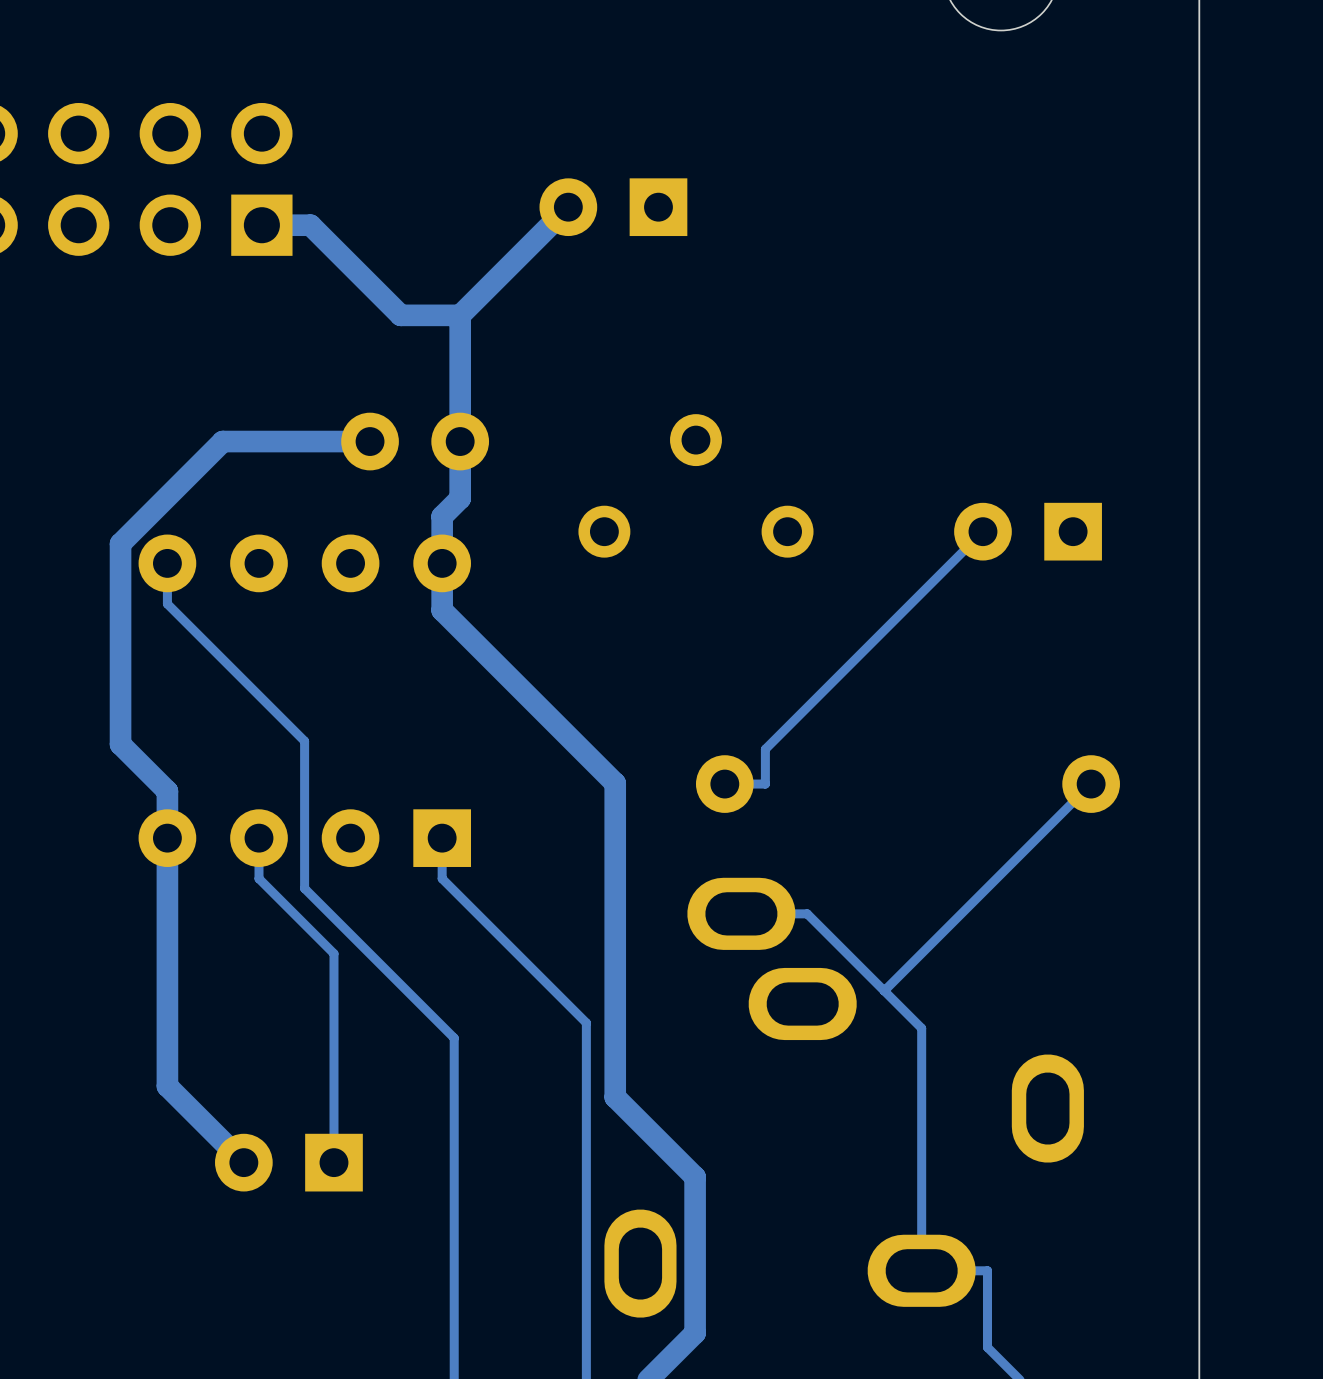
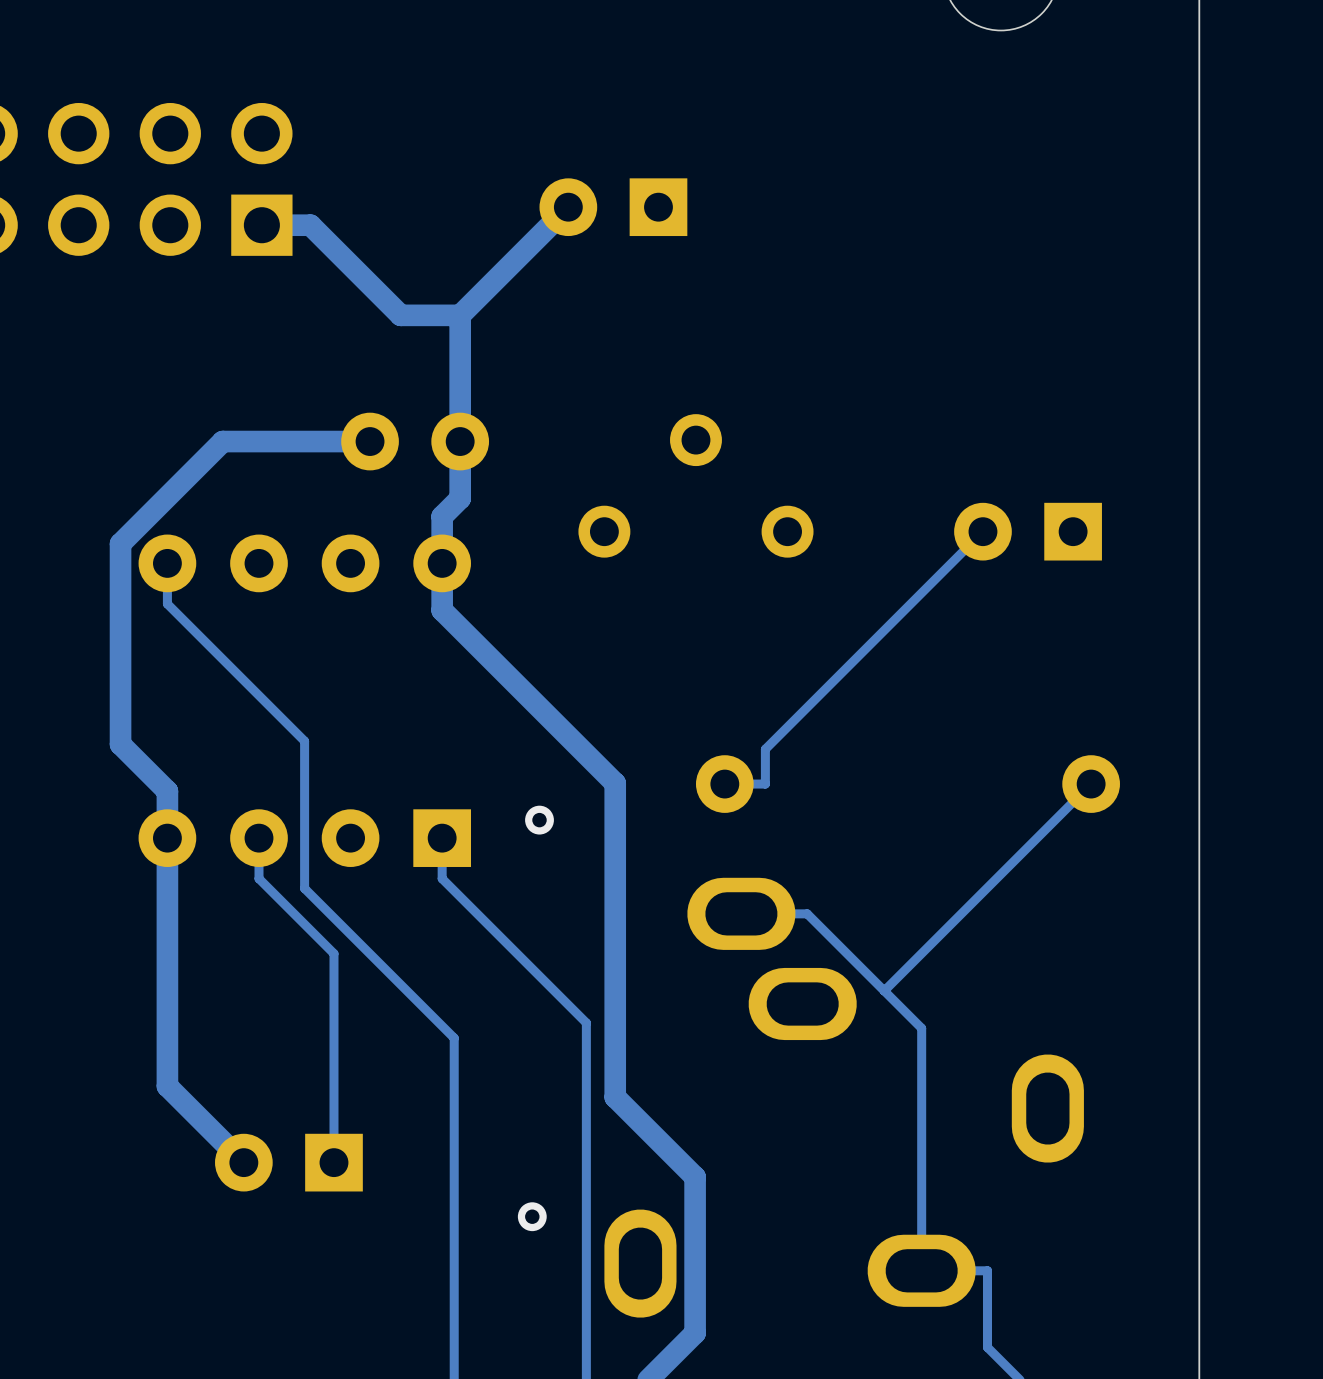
via: none -> (539, 820)
via: none -> (532, 1216)

